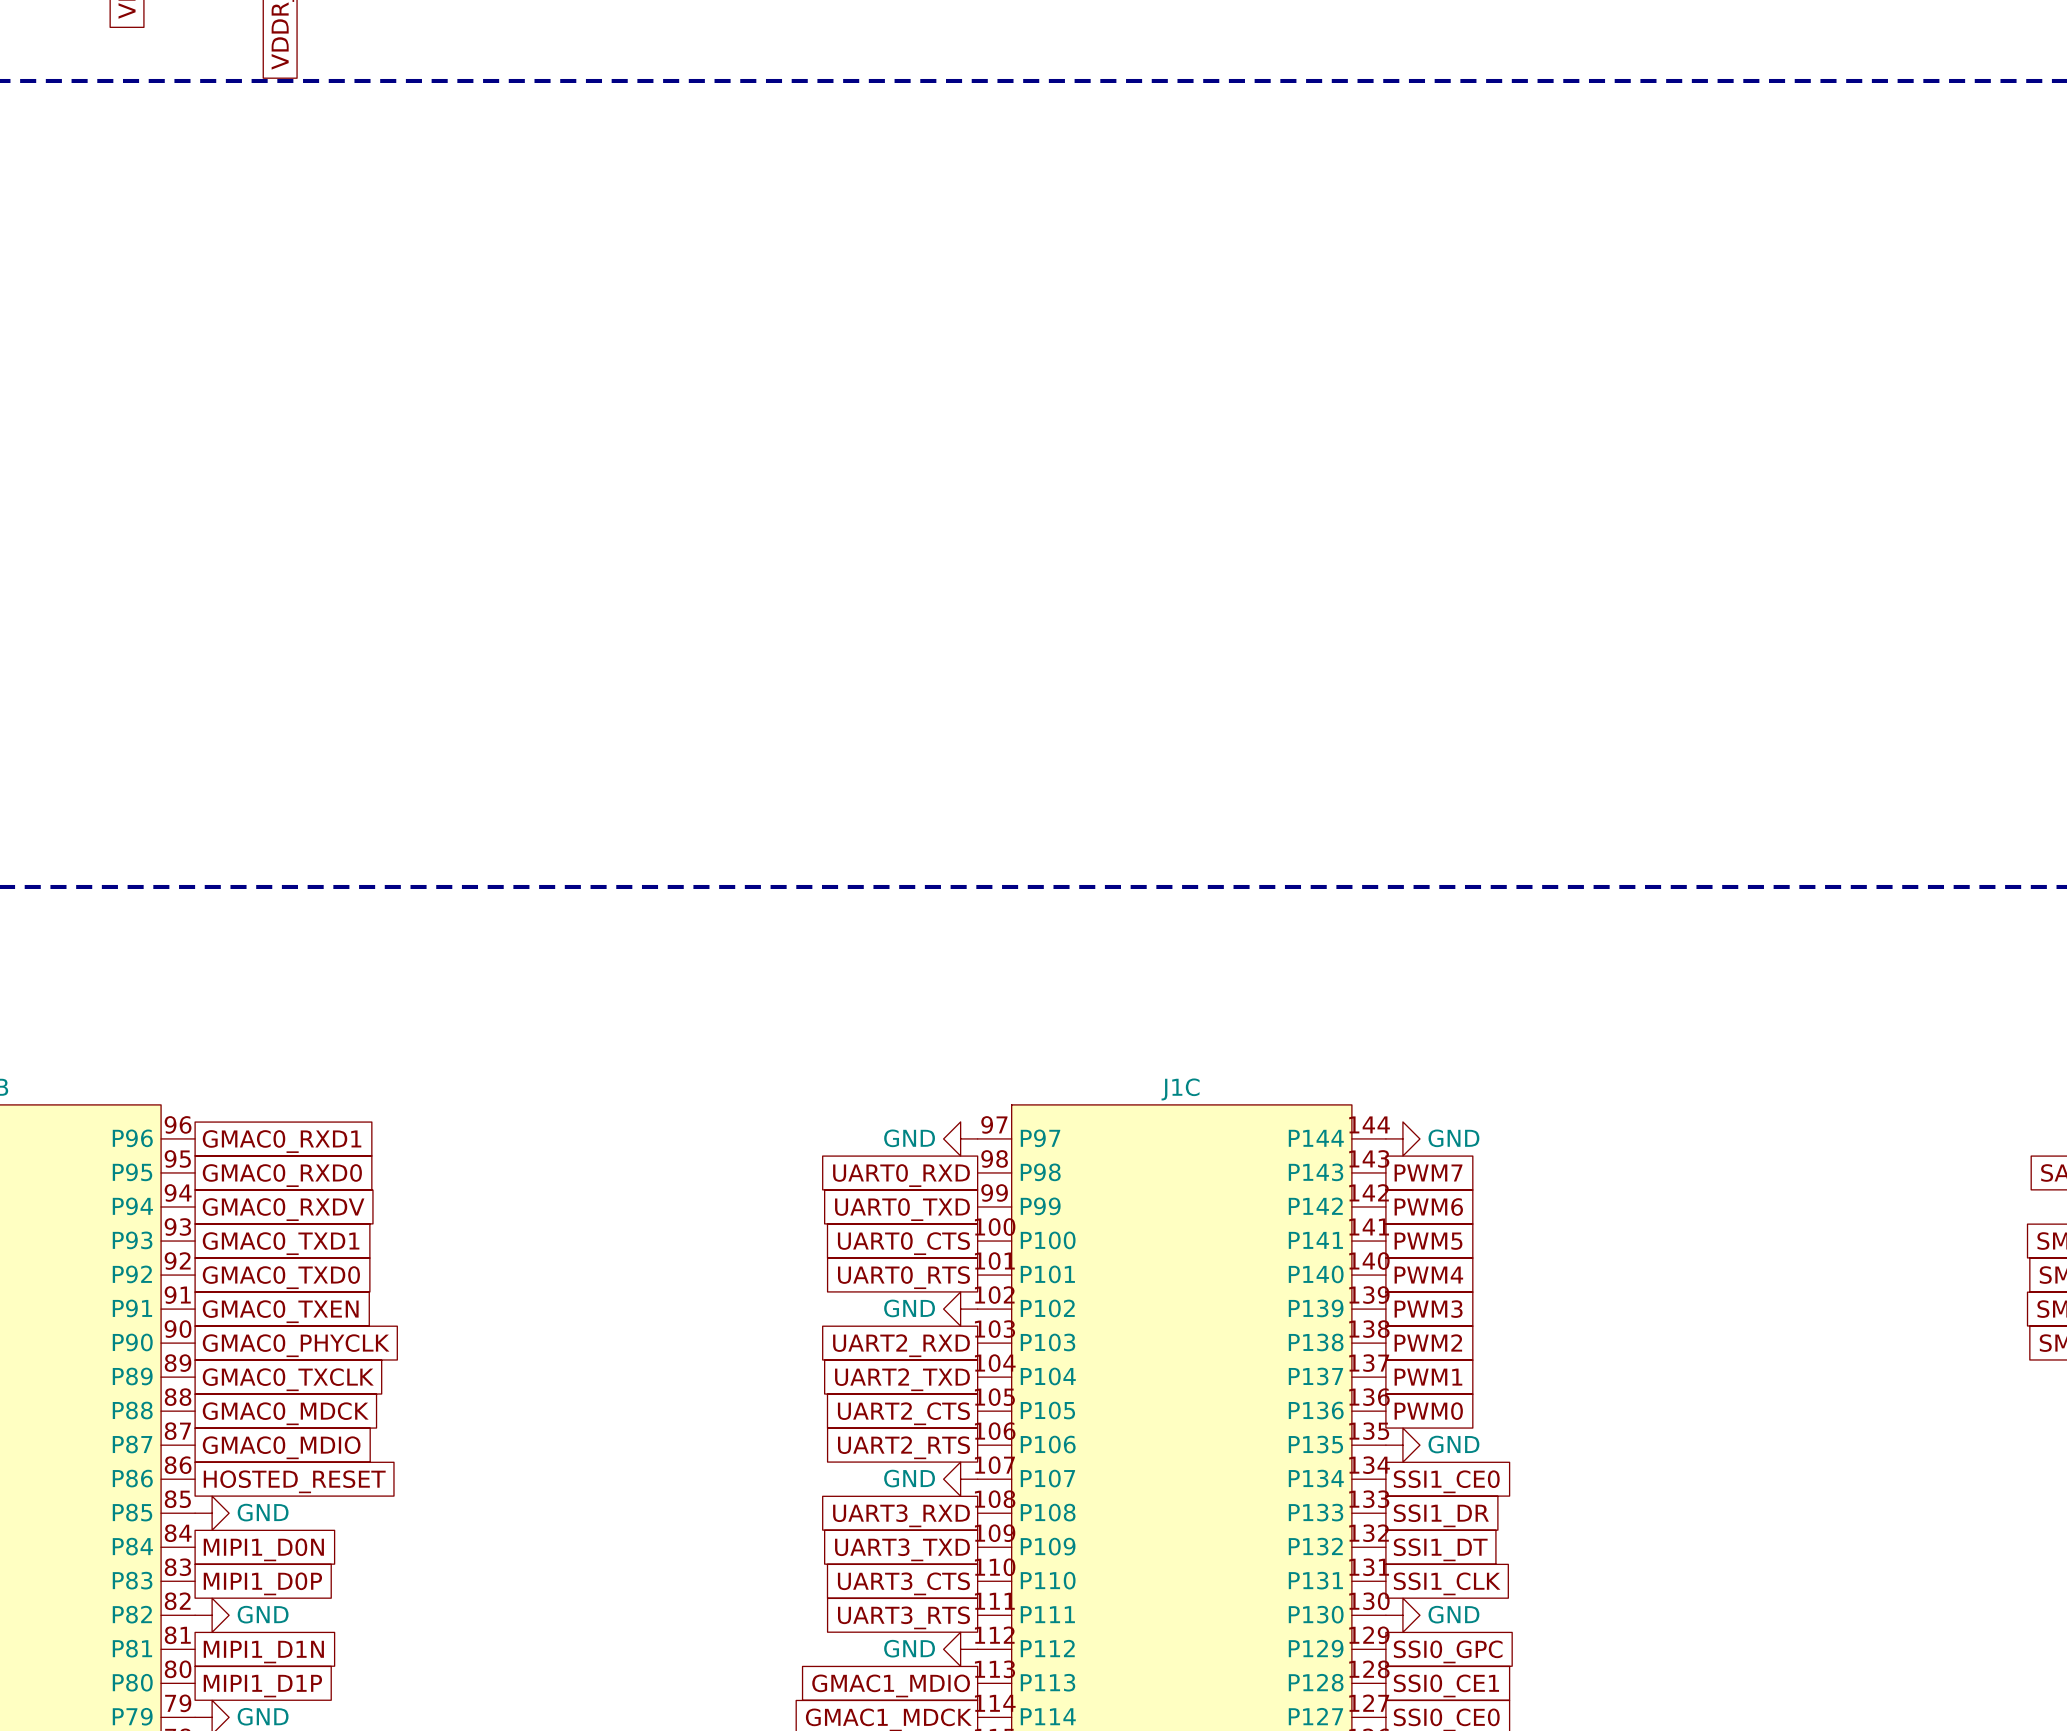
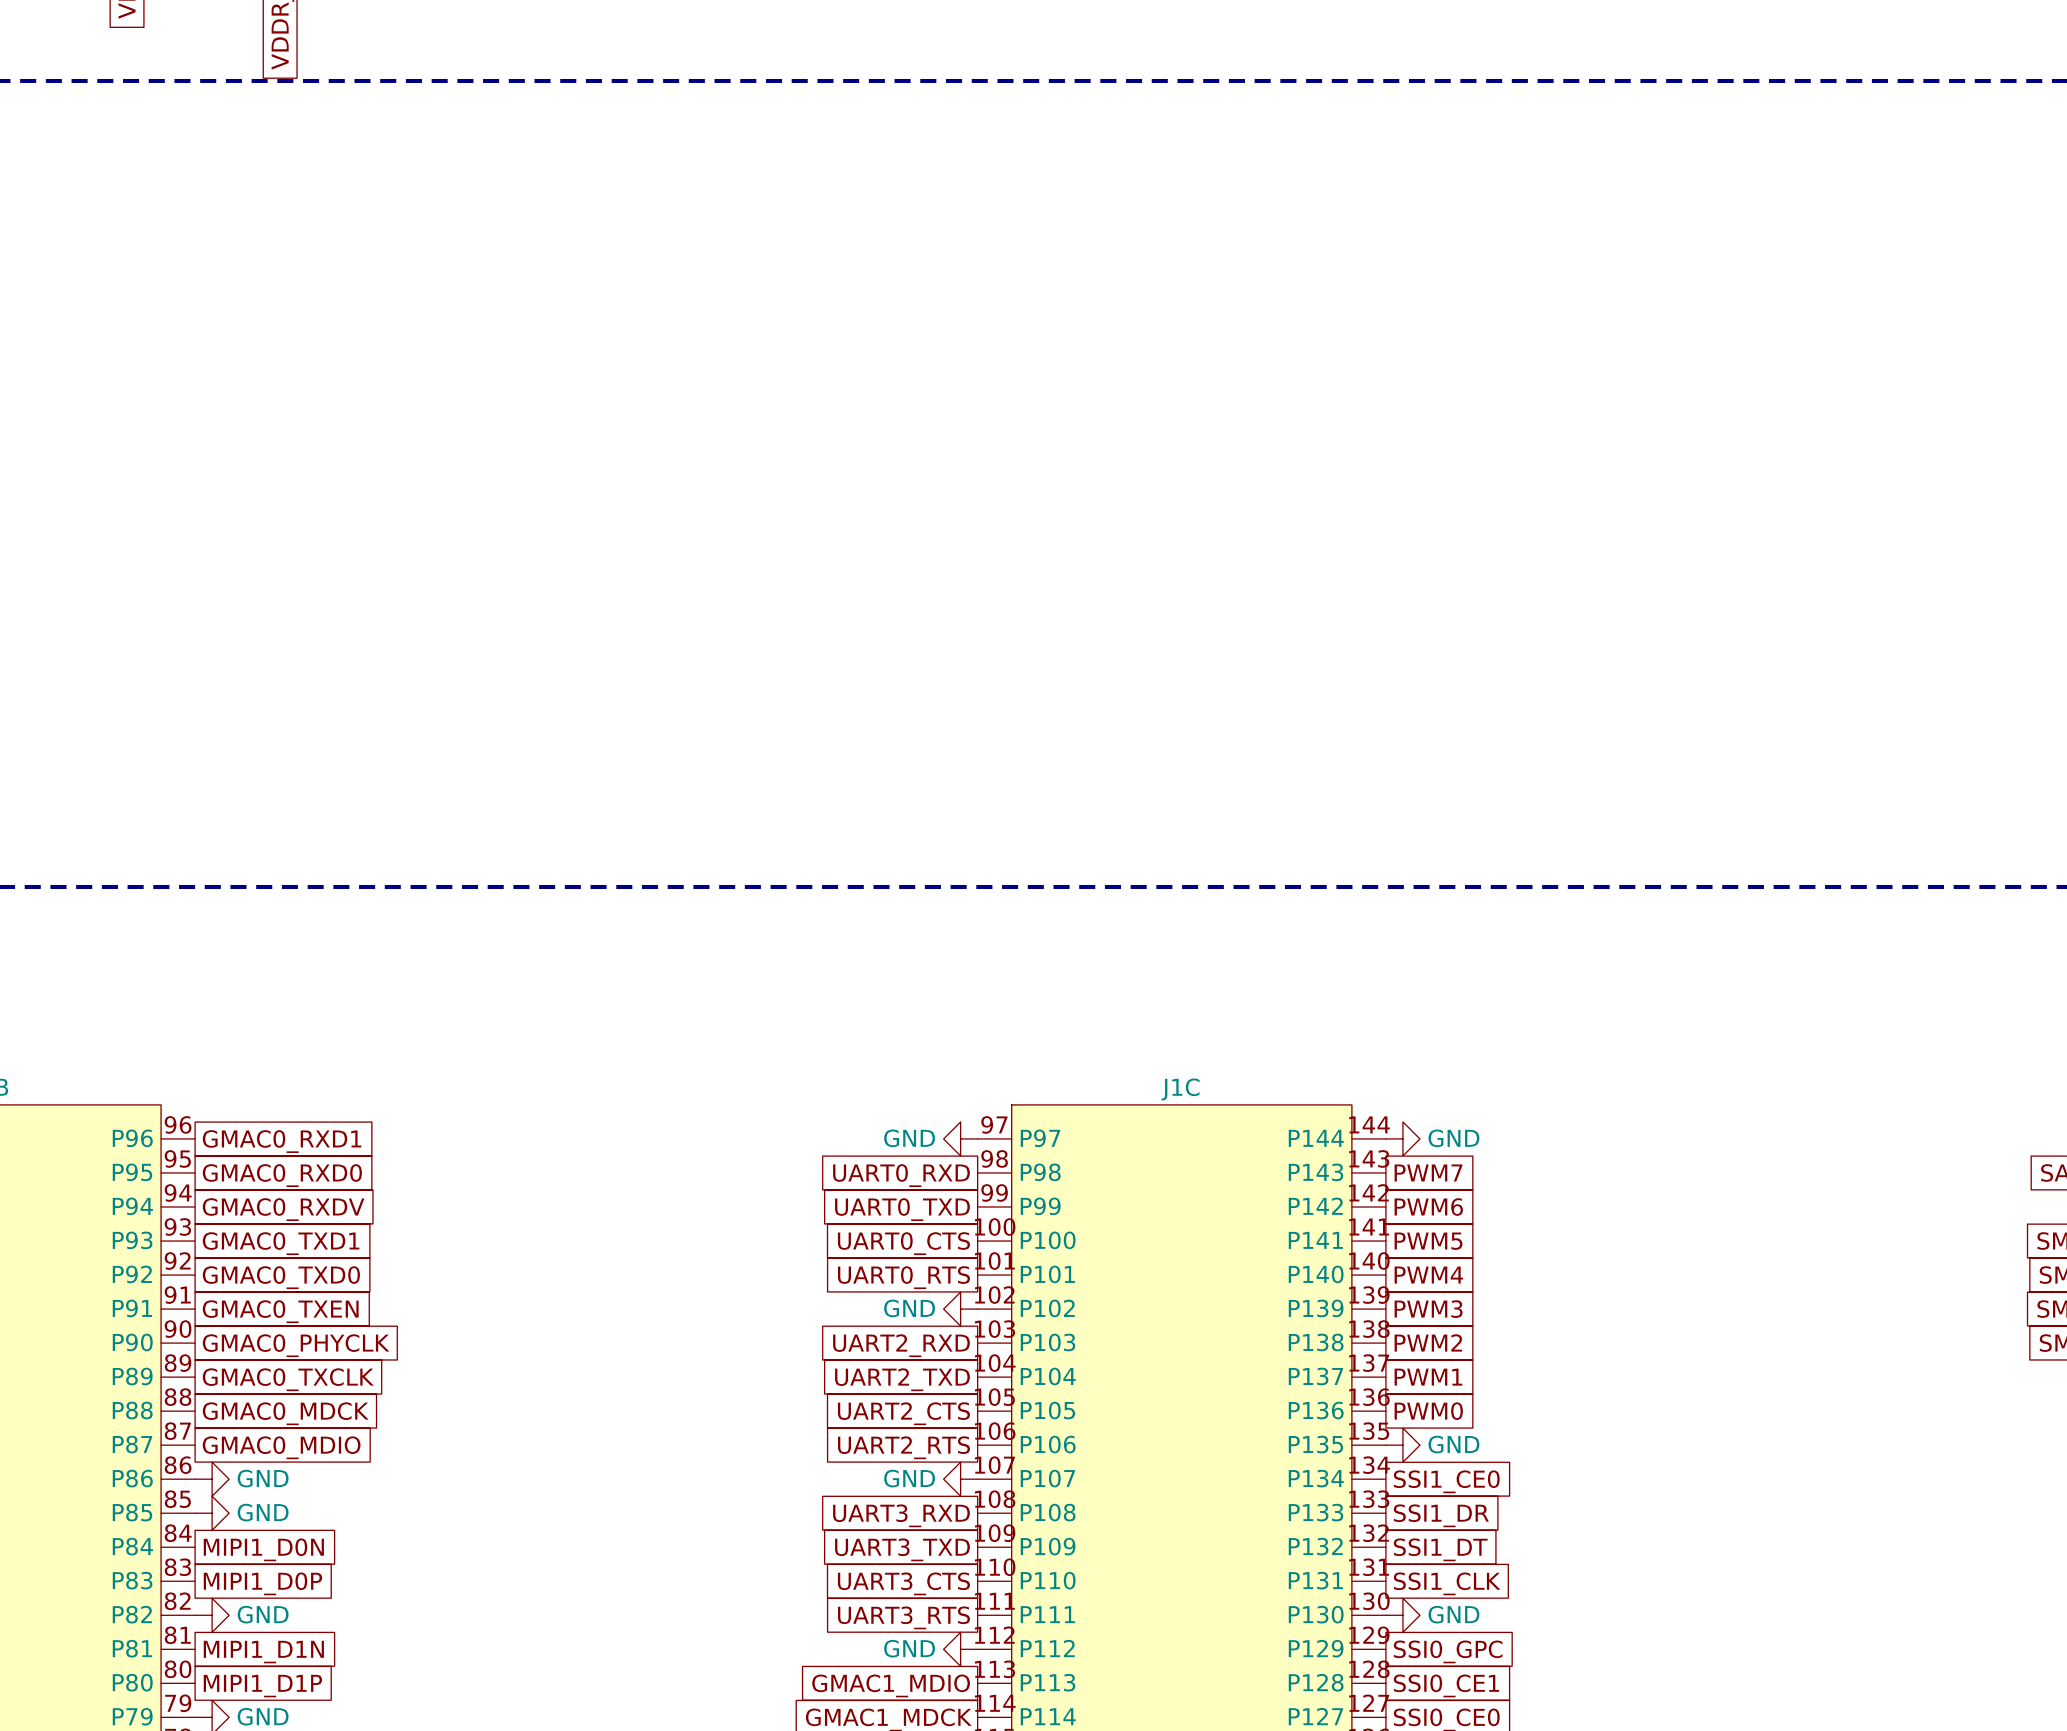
power symbol: none -> GND (212, 1479)
global label: HOSTED_RESET (294, 1481) -> none

